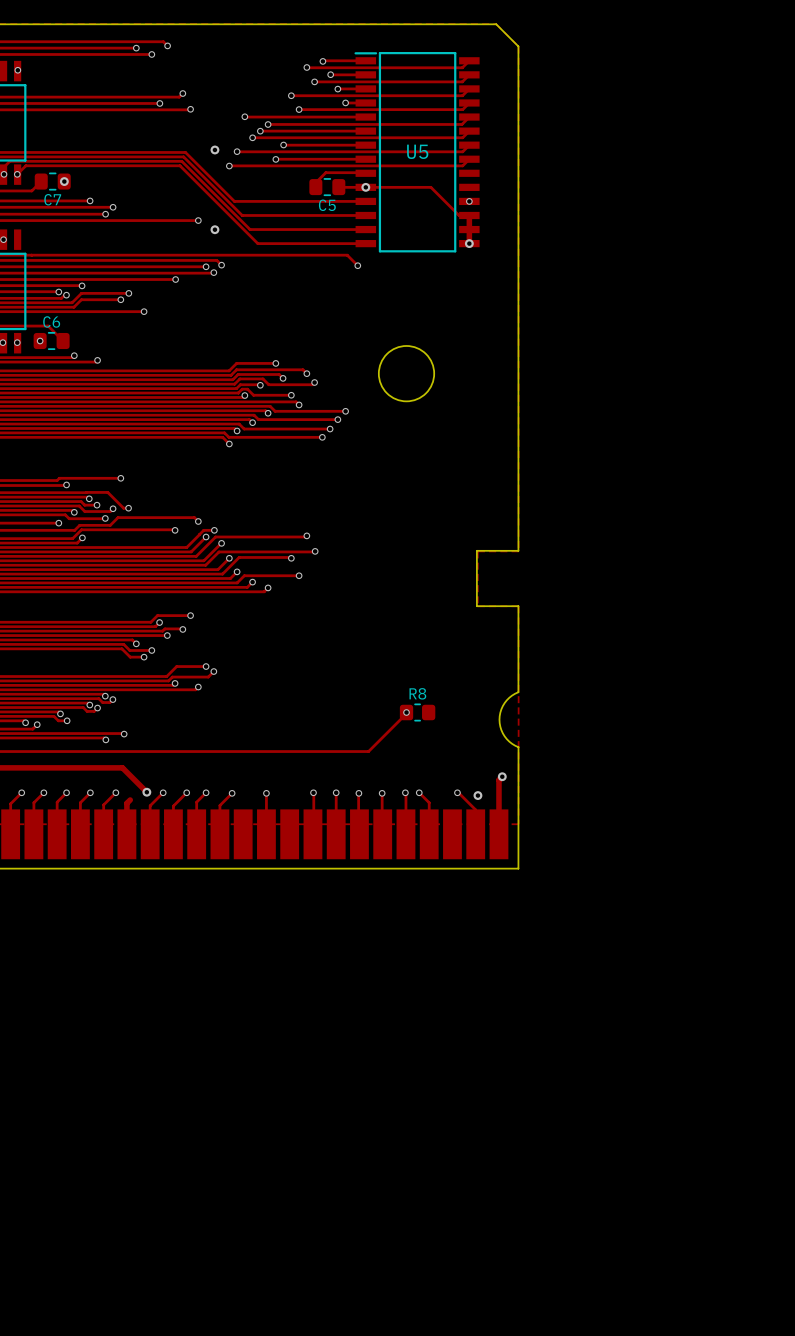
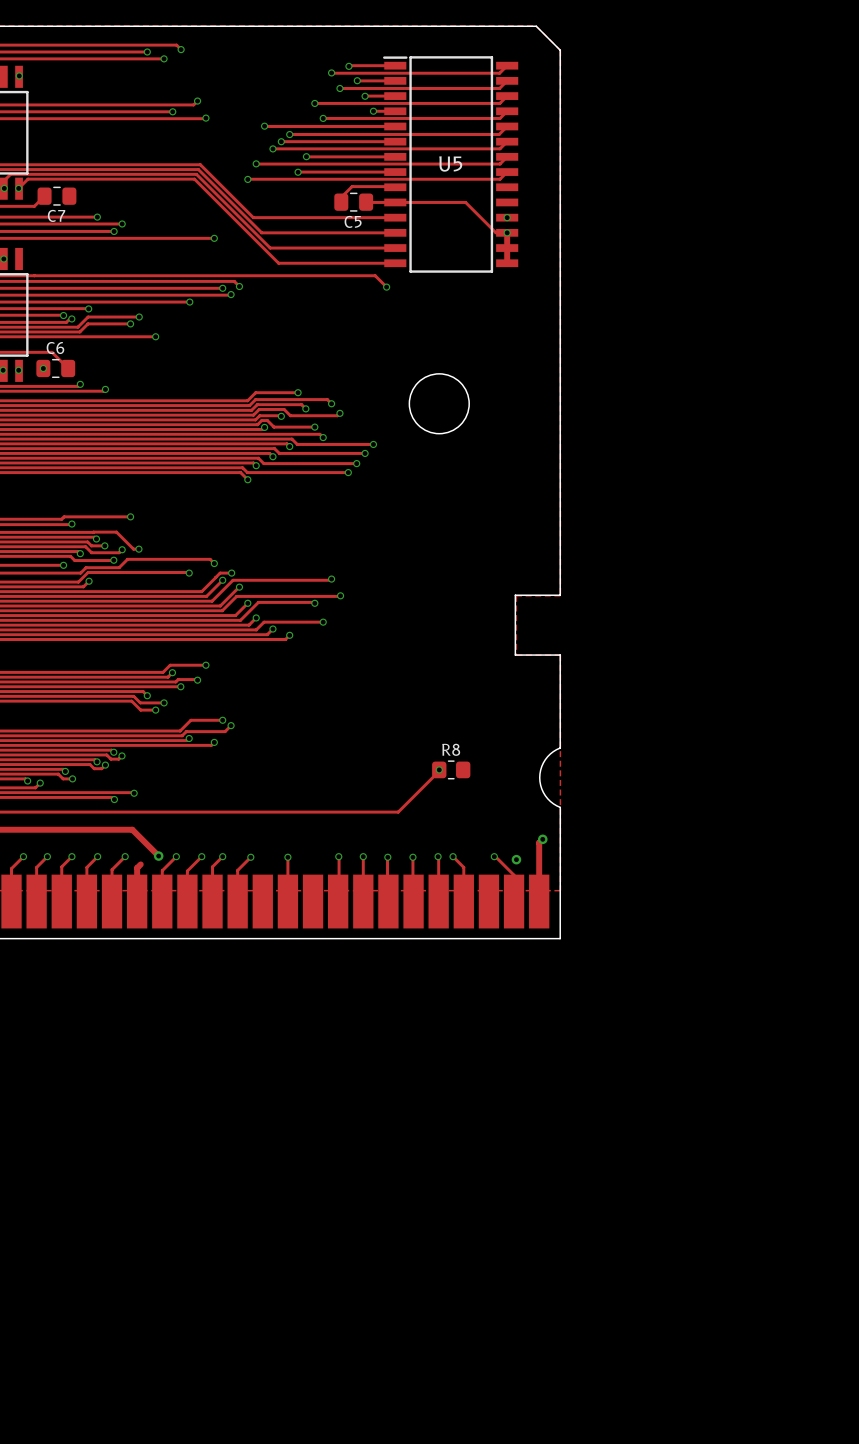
via: (214, 149) -> none
via: (64, 181) -> none
via: (365, 187) -> none
via: none -> (507, 232)
via: (214, 229) -> none
via: (469, 243) -> none

